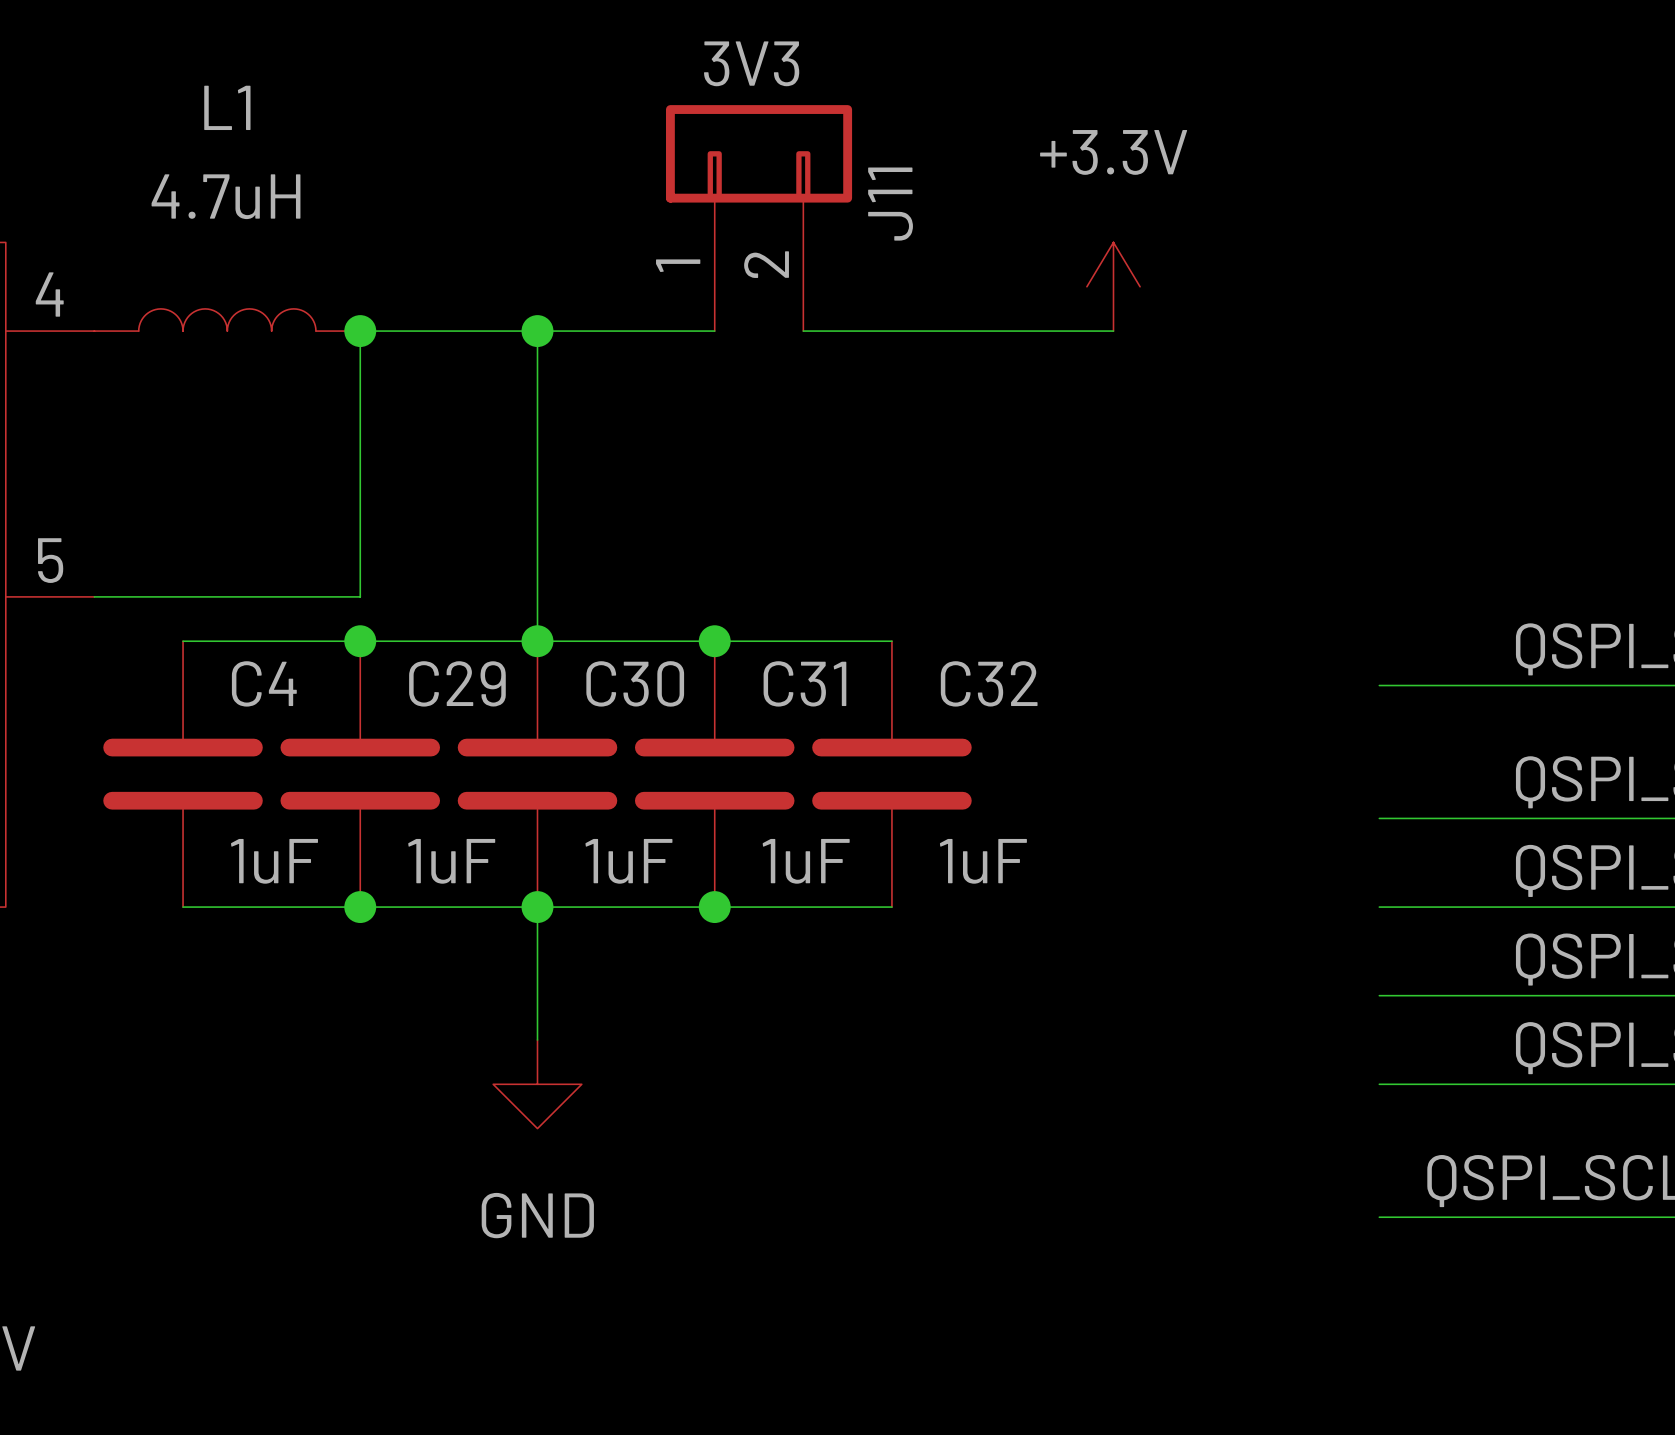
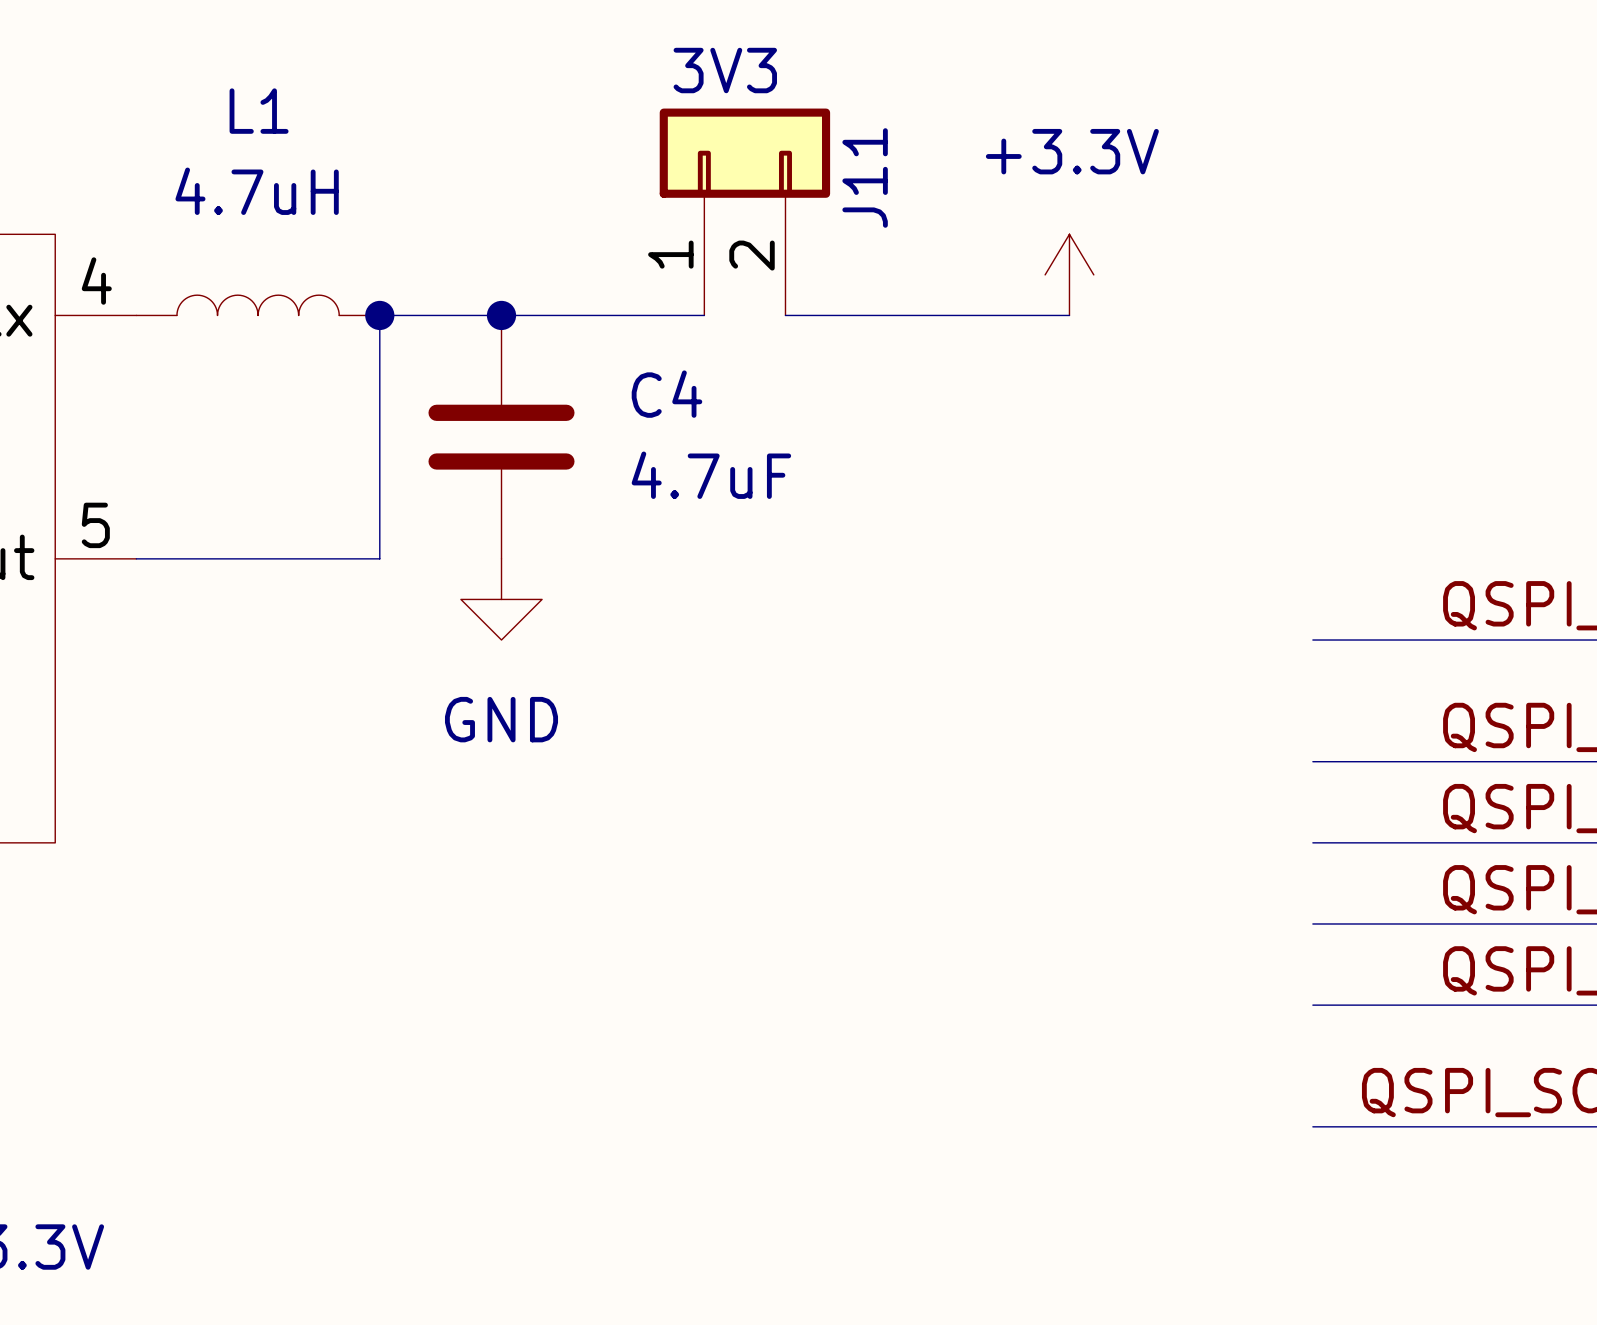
wire: (537, 331) (537, 641) -> none
junction position: (537, 331) -> (501, 315)
wire: (183, 641) (891, 641) -> none
junction: (360, 641) -> none
junction: (537, 641) -> none
junction: (714, 641) -> none
C4 name position: C4 (264, 683) -> C4 (666, 394)
C4 position: (183, 774) -> (501, 437)
C29: 1uF (360, 774) -> none
C30: 1uF (537, 774) -> none
C31: 1uF (714, 774) -> none
C32: 1uF (891, 774) -> none
C4 value: 1uF (274, 861) -> 4.7uF (711, 475)
wire: (183, 907) (891, 907) -> none
junction: (360, 907) -> none
wire: (537, 907) (537, 1039) -> none
junction: (537, 907) -> none
junction: (714, 907) -> none
power symbol position: GND (537, 1084) -> GND (501, 599)

